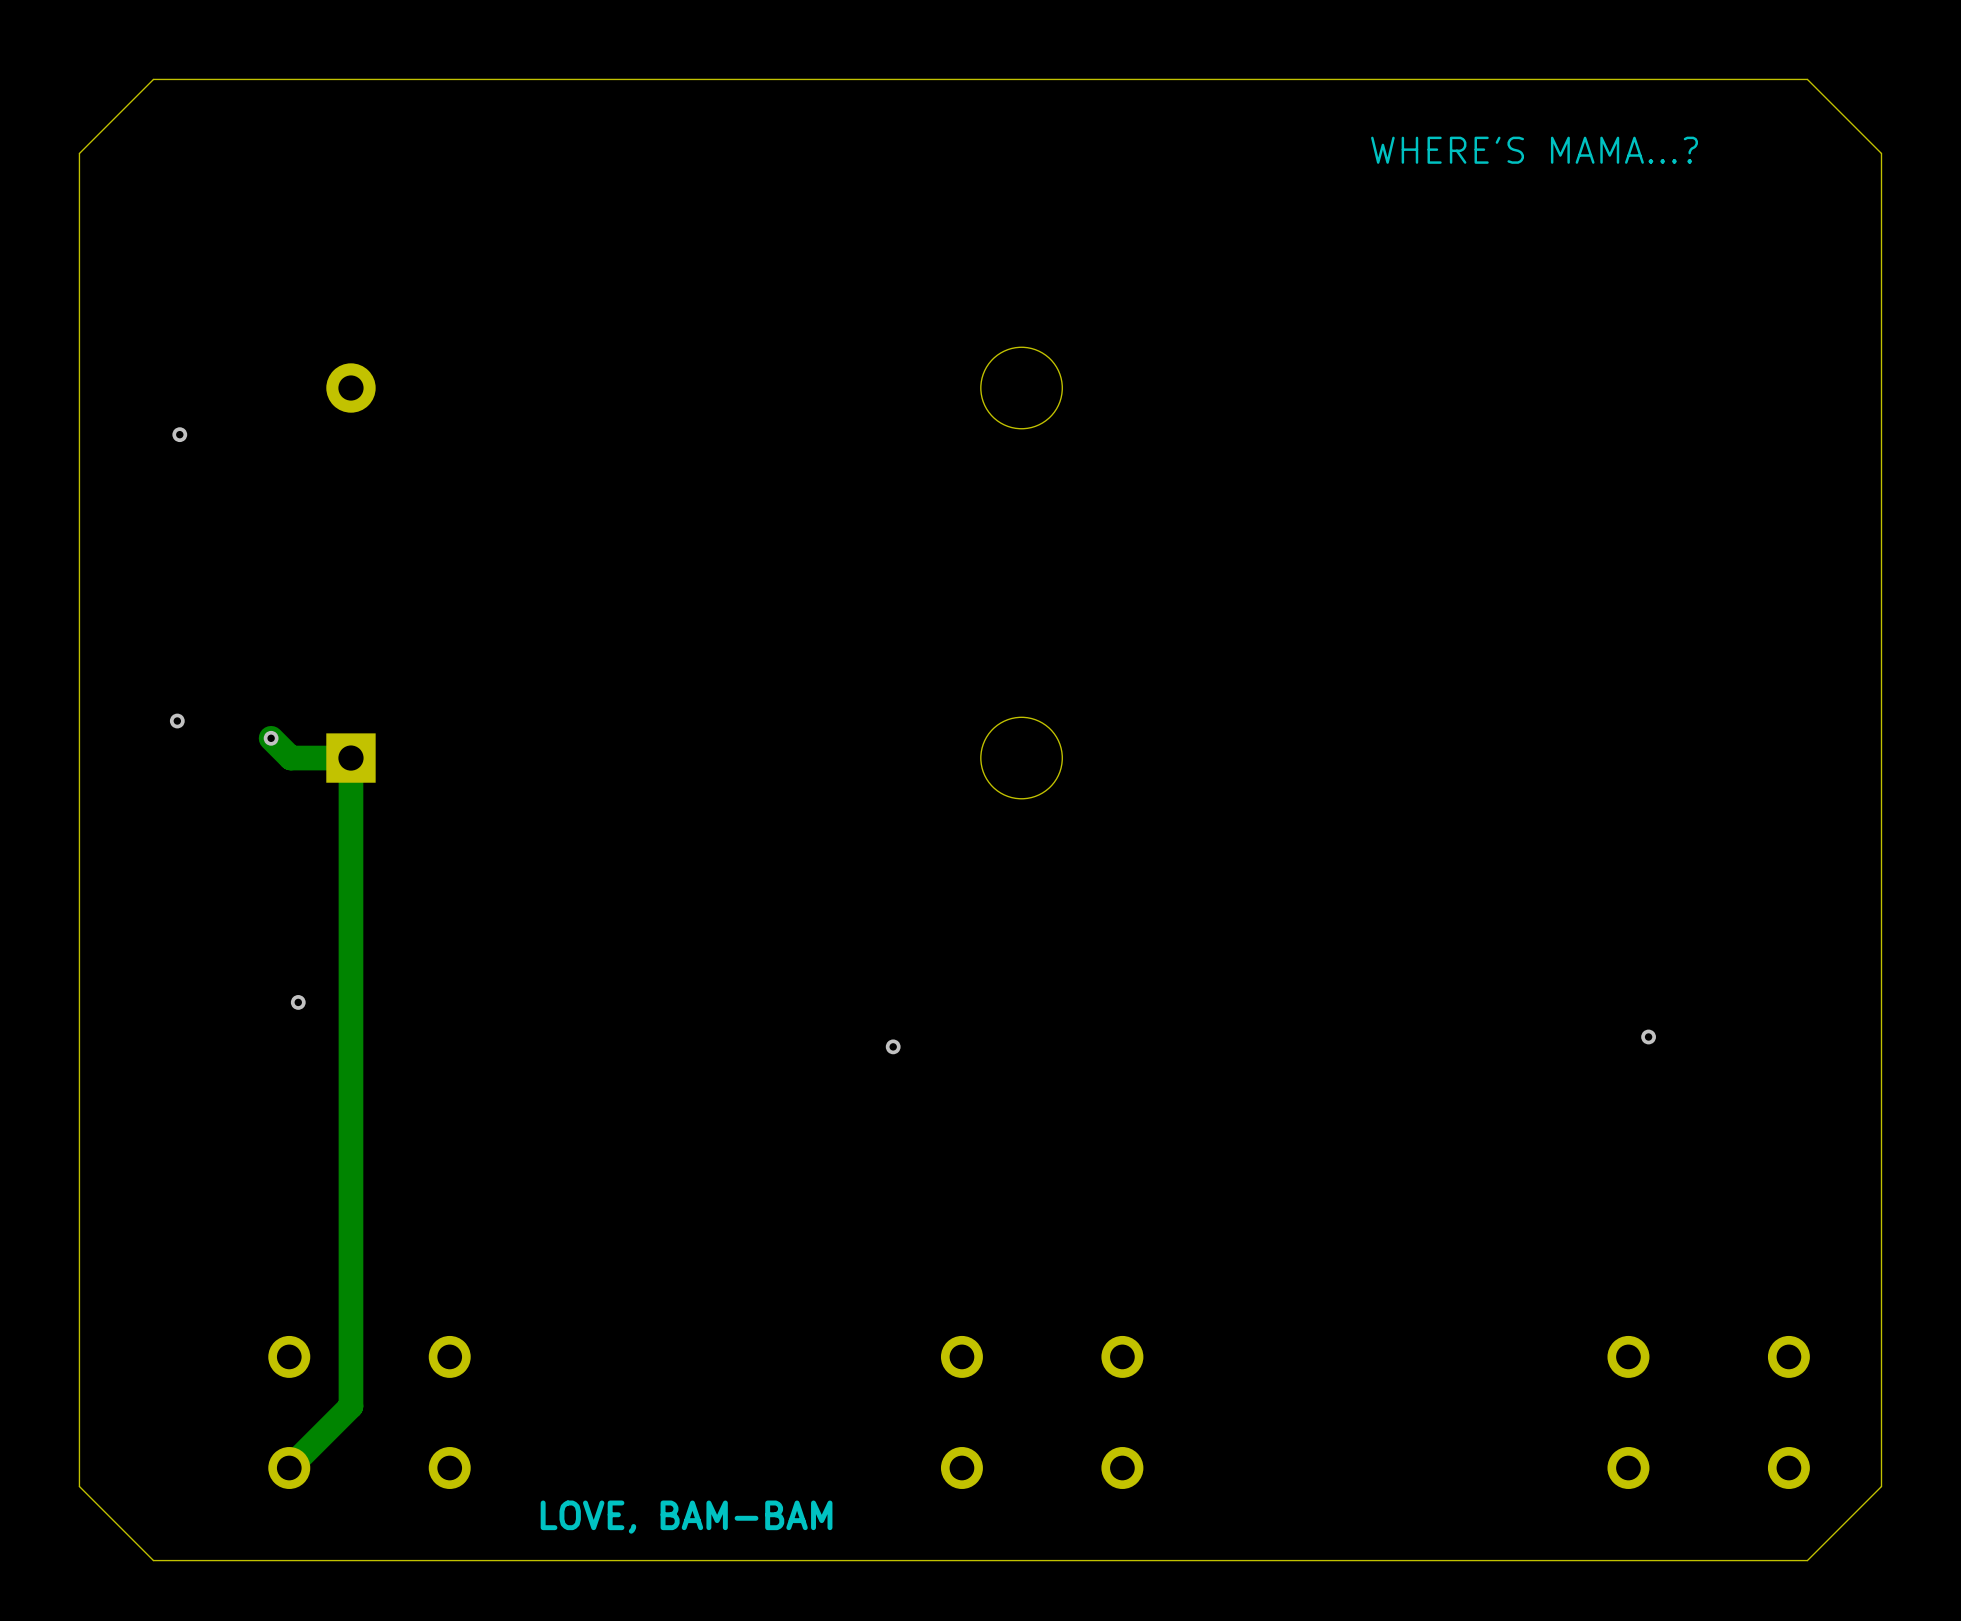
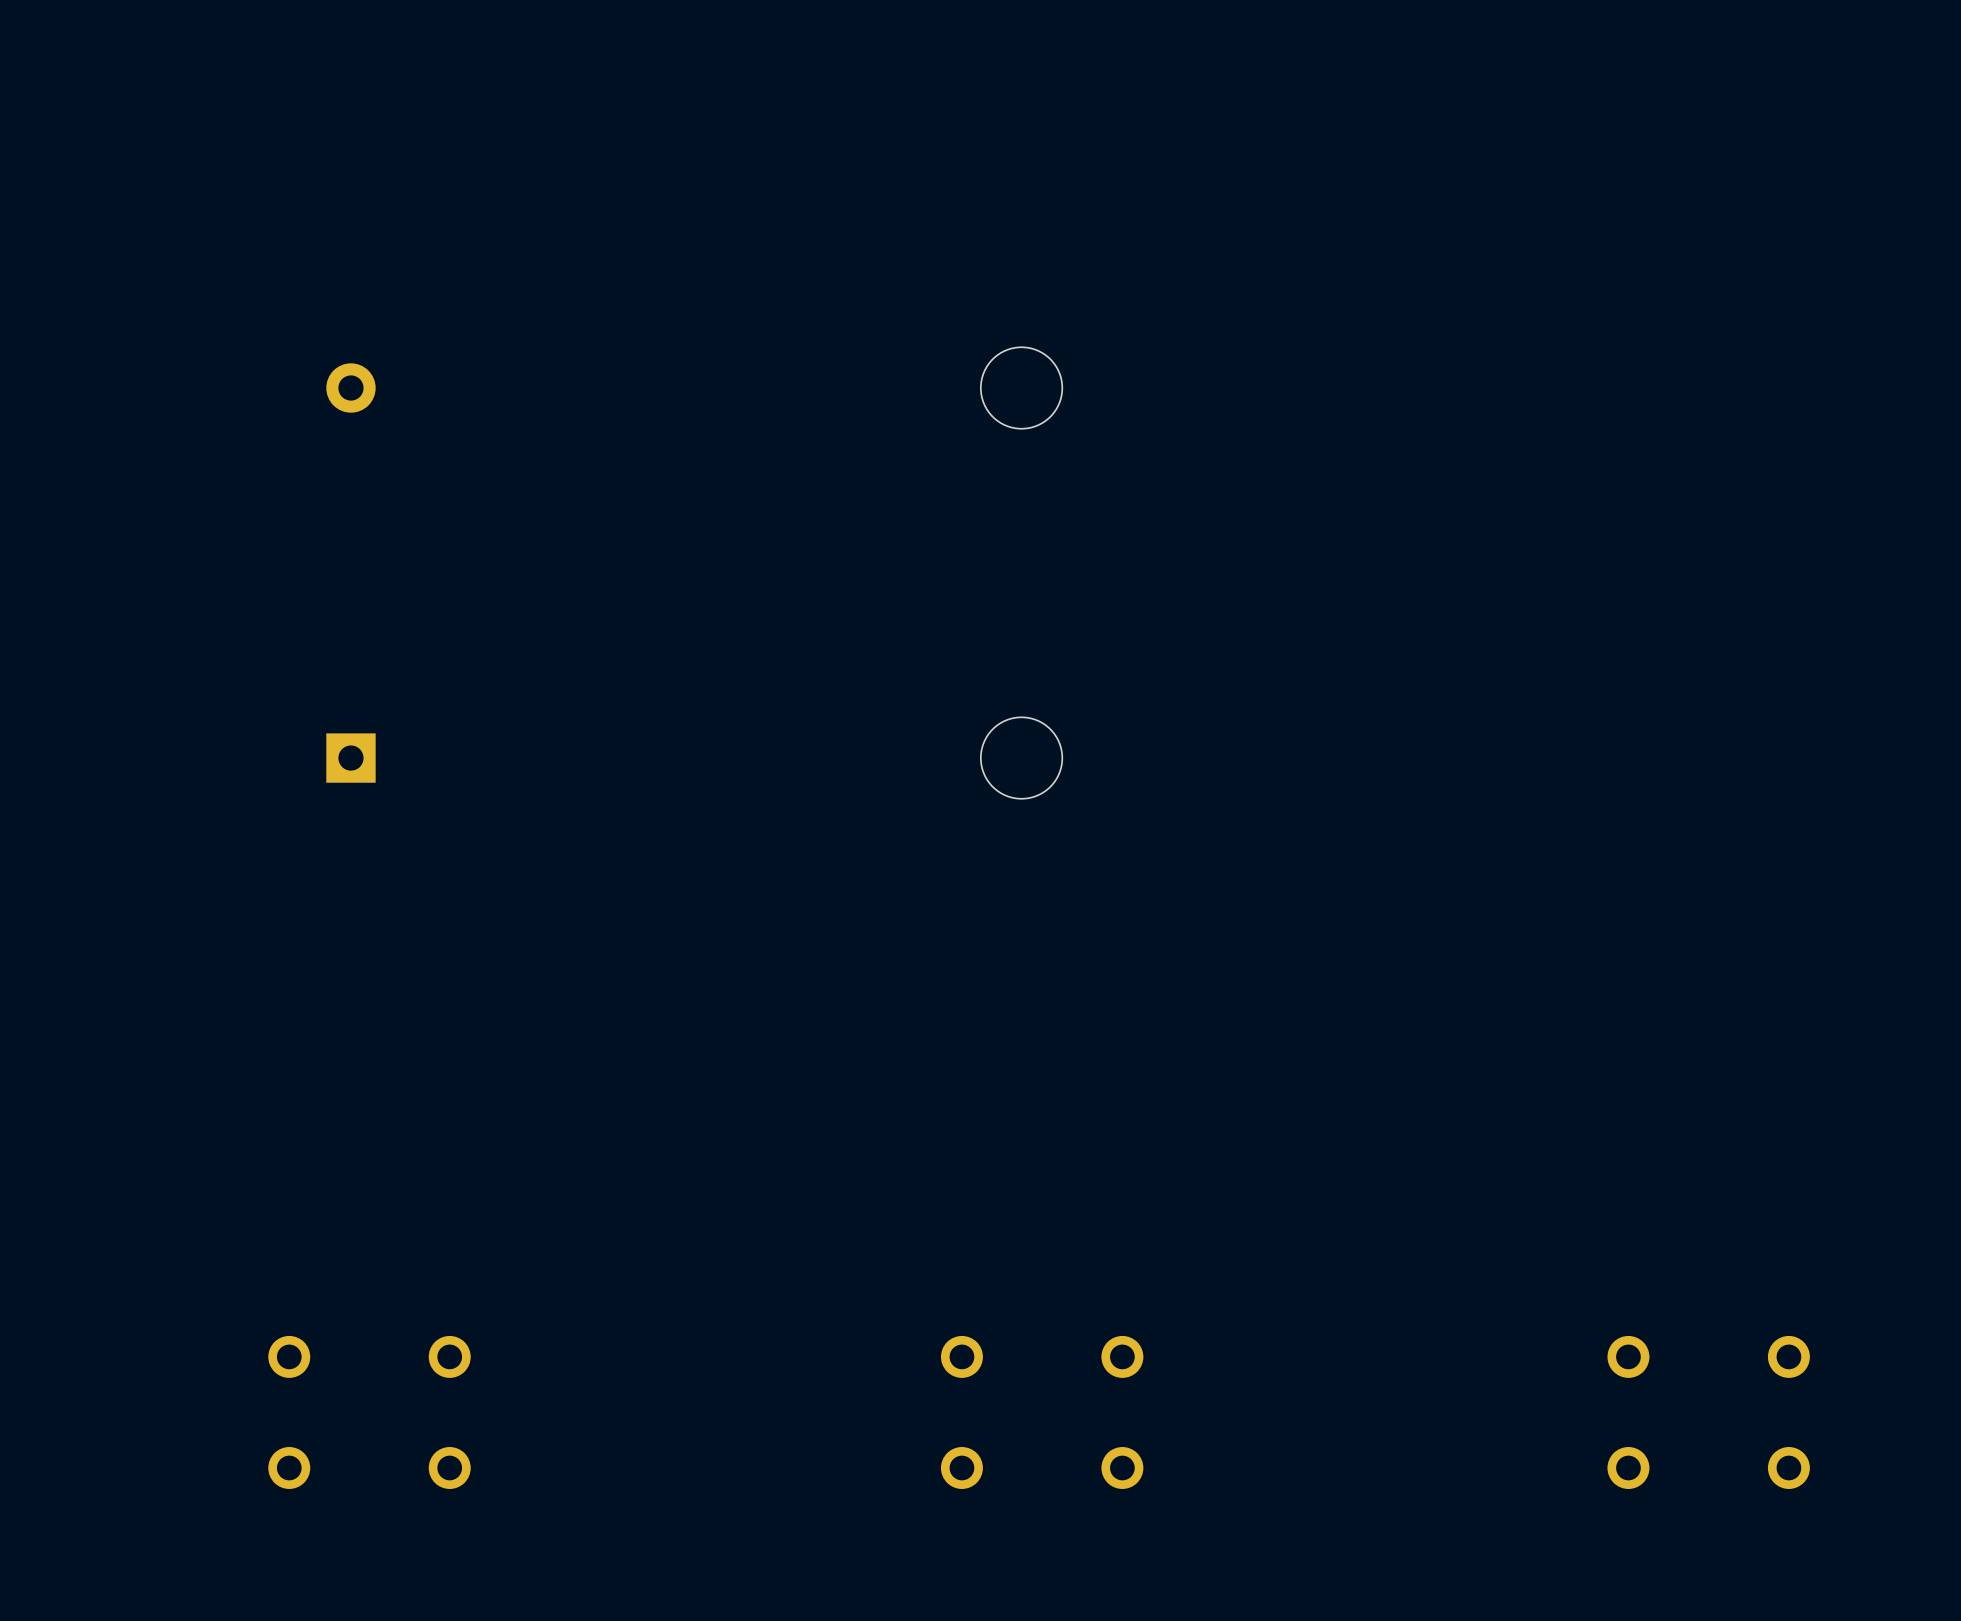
board edge: (1807, 79) (153, 79) (79, 153) (79, 1486) (153, 1560) (1807, 1560) (1881, 1486) (1881, 153) (1807, 79) -> none
text: WHERE'S MAMA...? (1534, 150) -> none
via: (179, 434) -> none
via: (177, 721) -> none
track: (271, 738) (290, 758) (350, 758) (350, 1406) (289, 1468) -> none
via: (271, 738) -> none
via: (298, 1002) -> none
via: (1648, 1036) -> none
via: (893, 1046) -> none
text: LOVE, BAM-BAM (686, 1517) -> none

